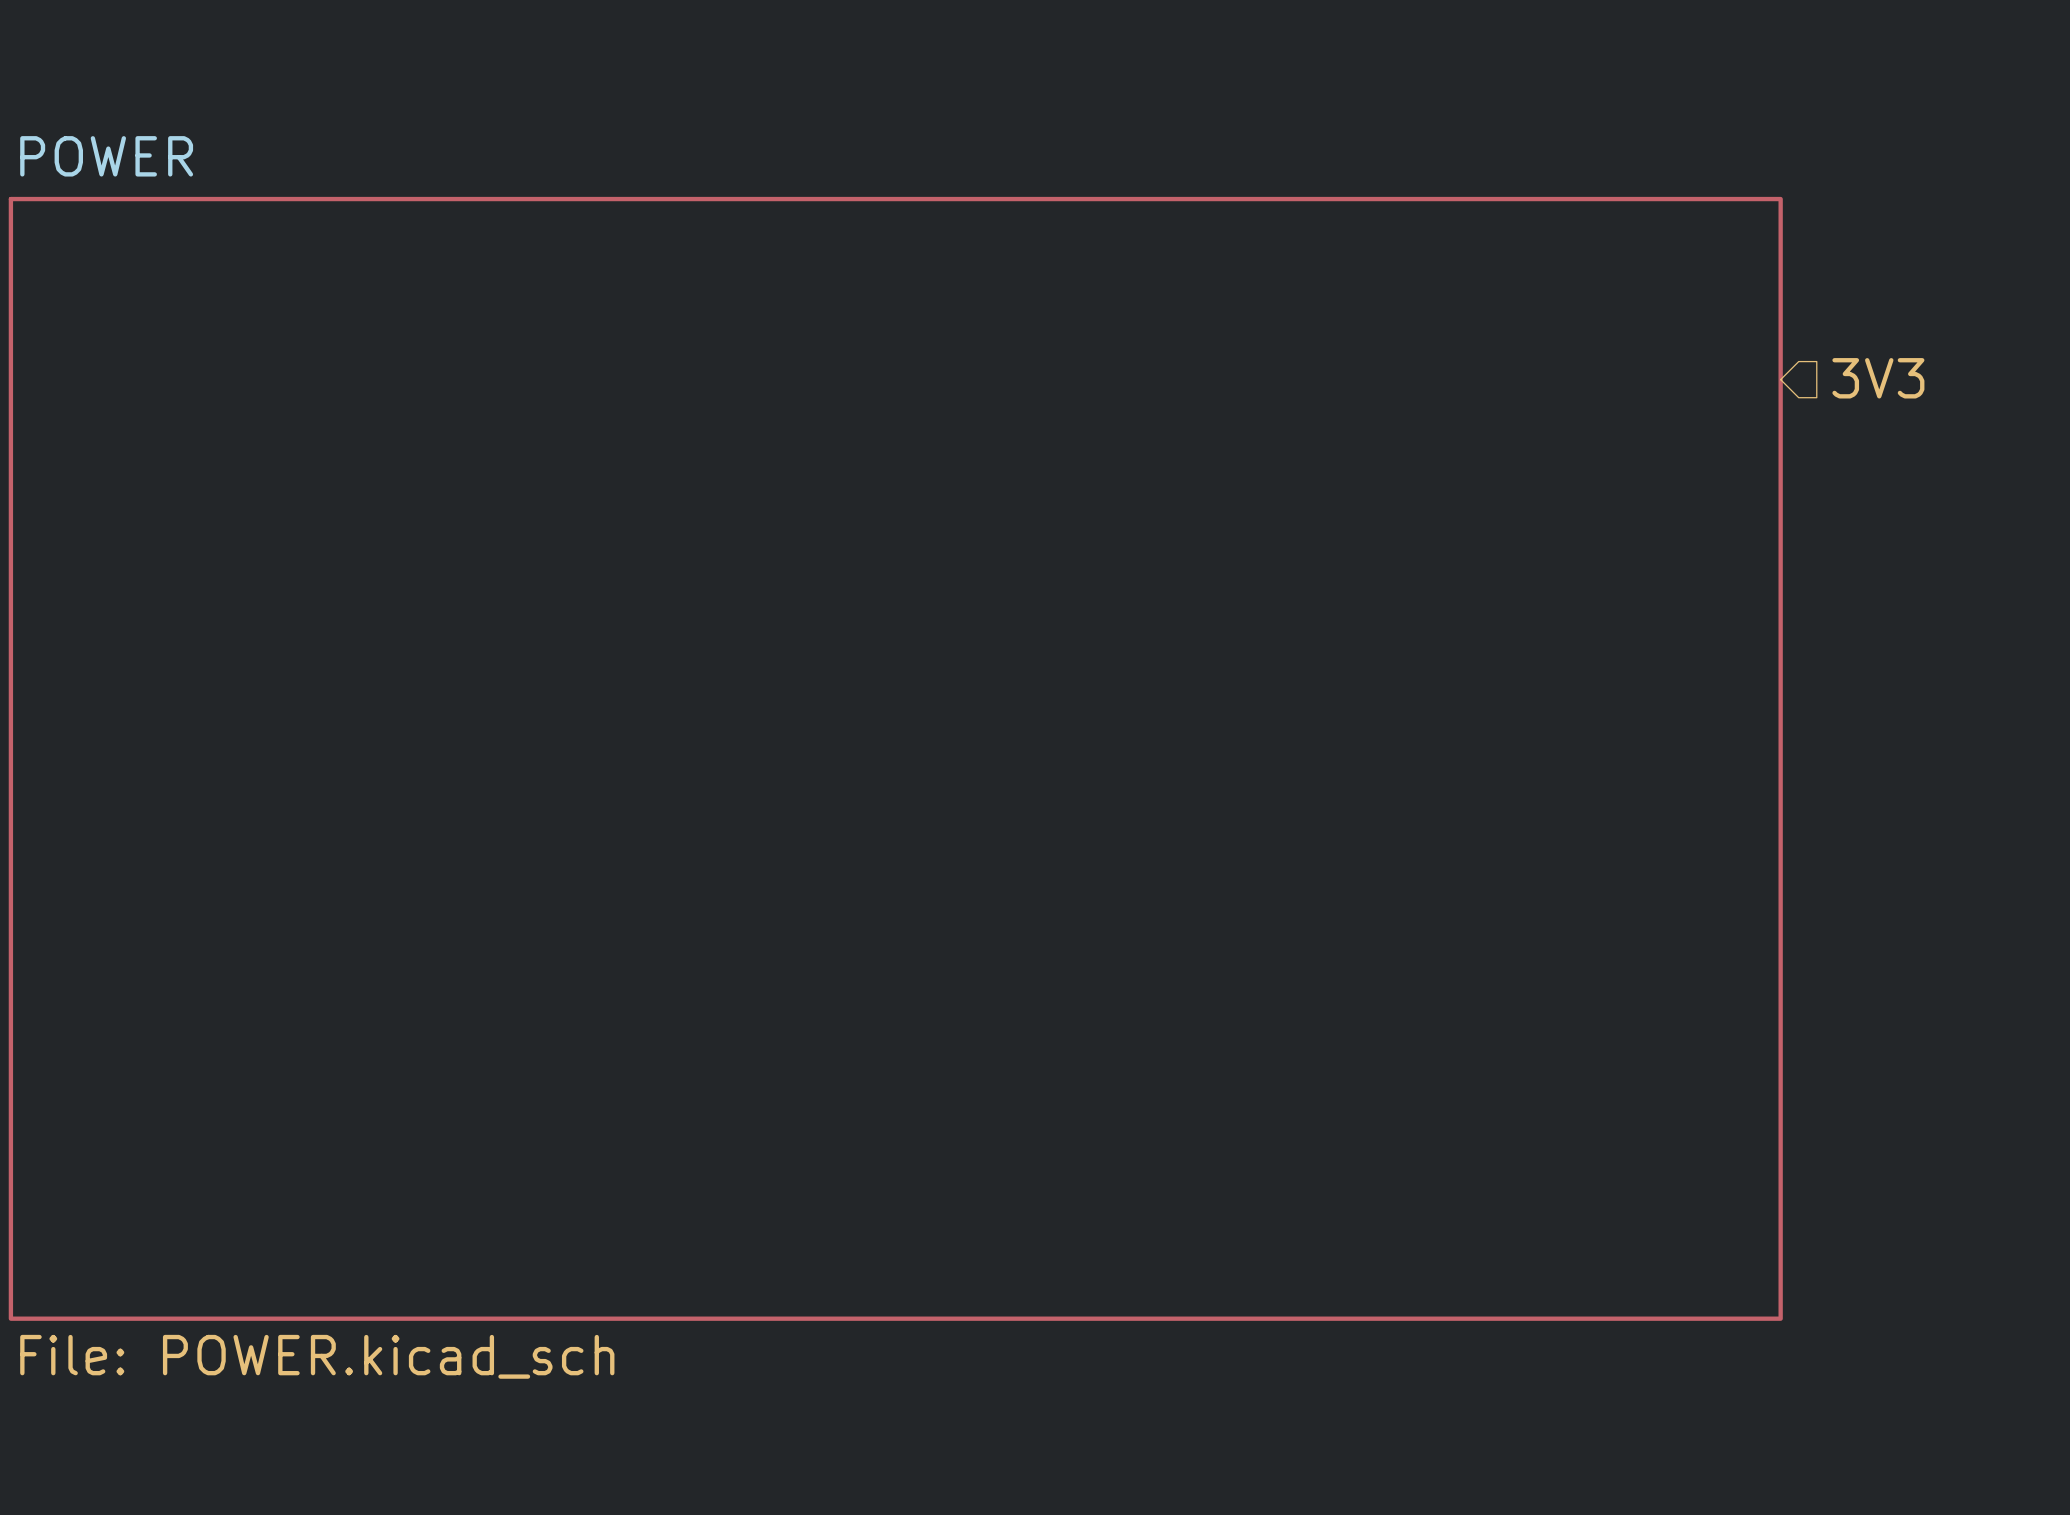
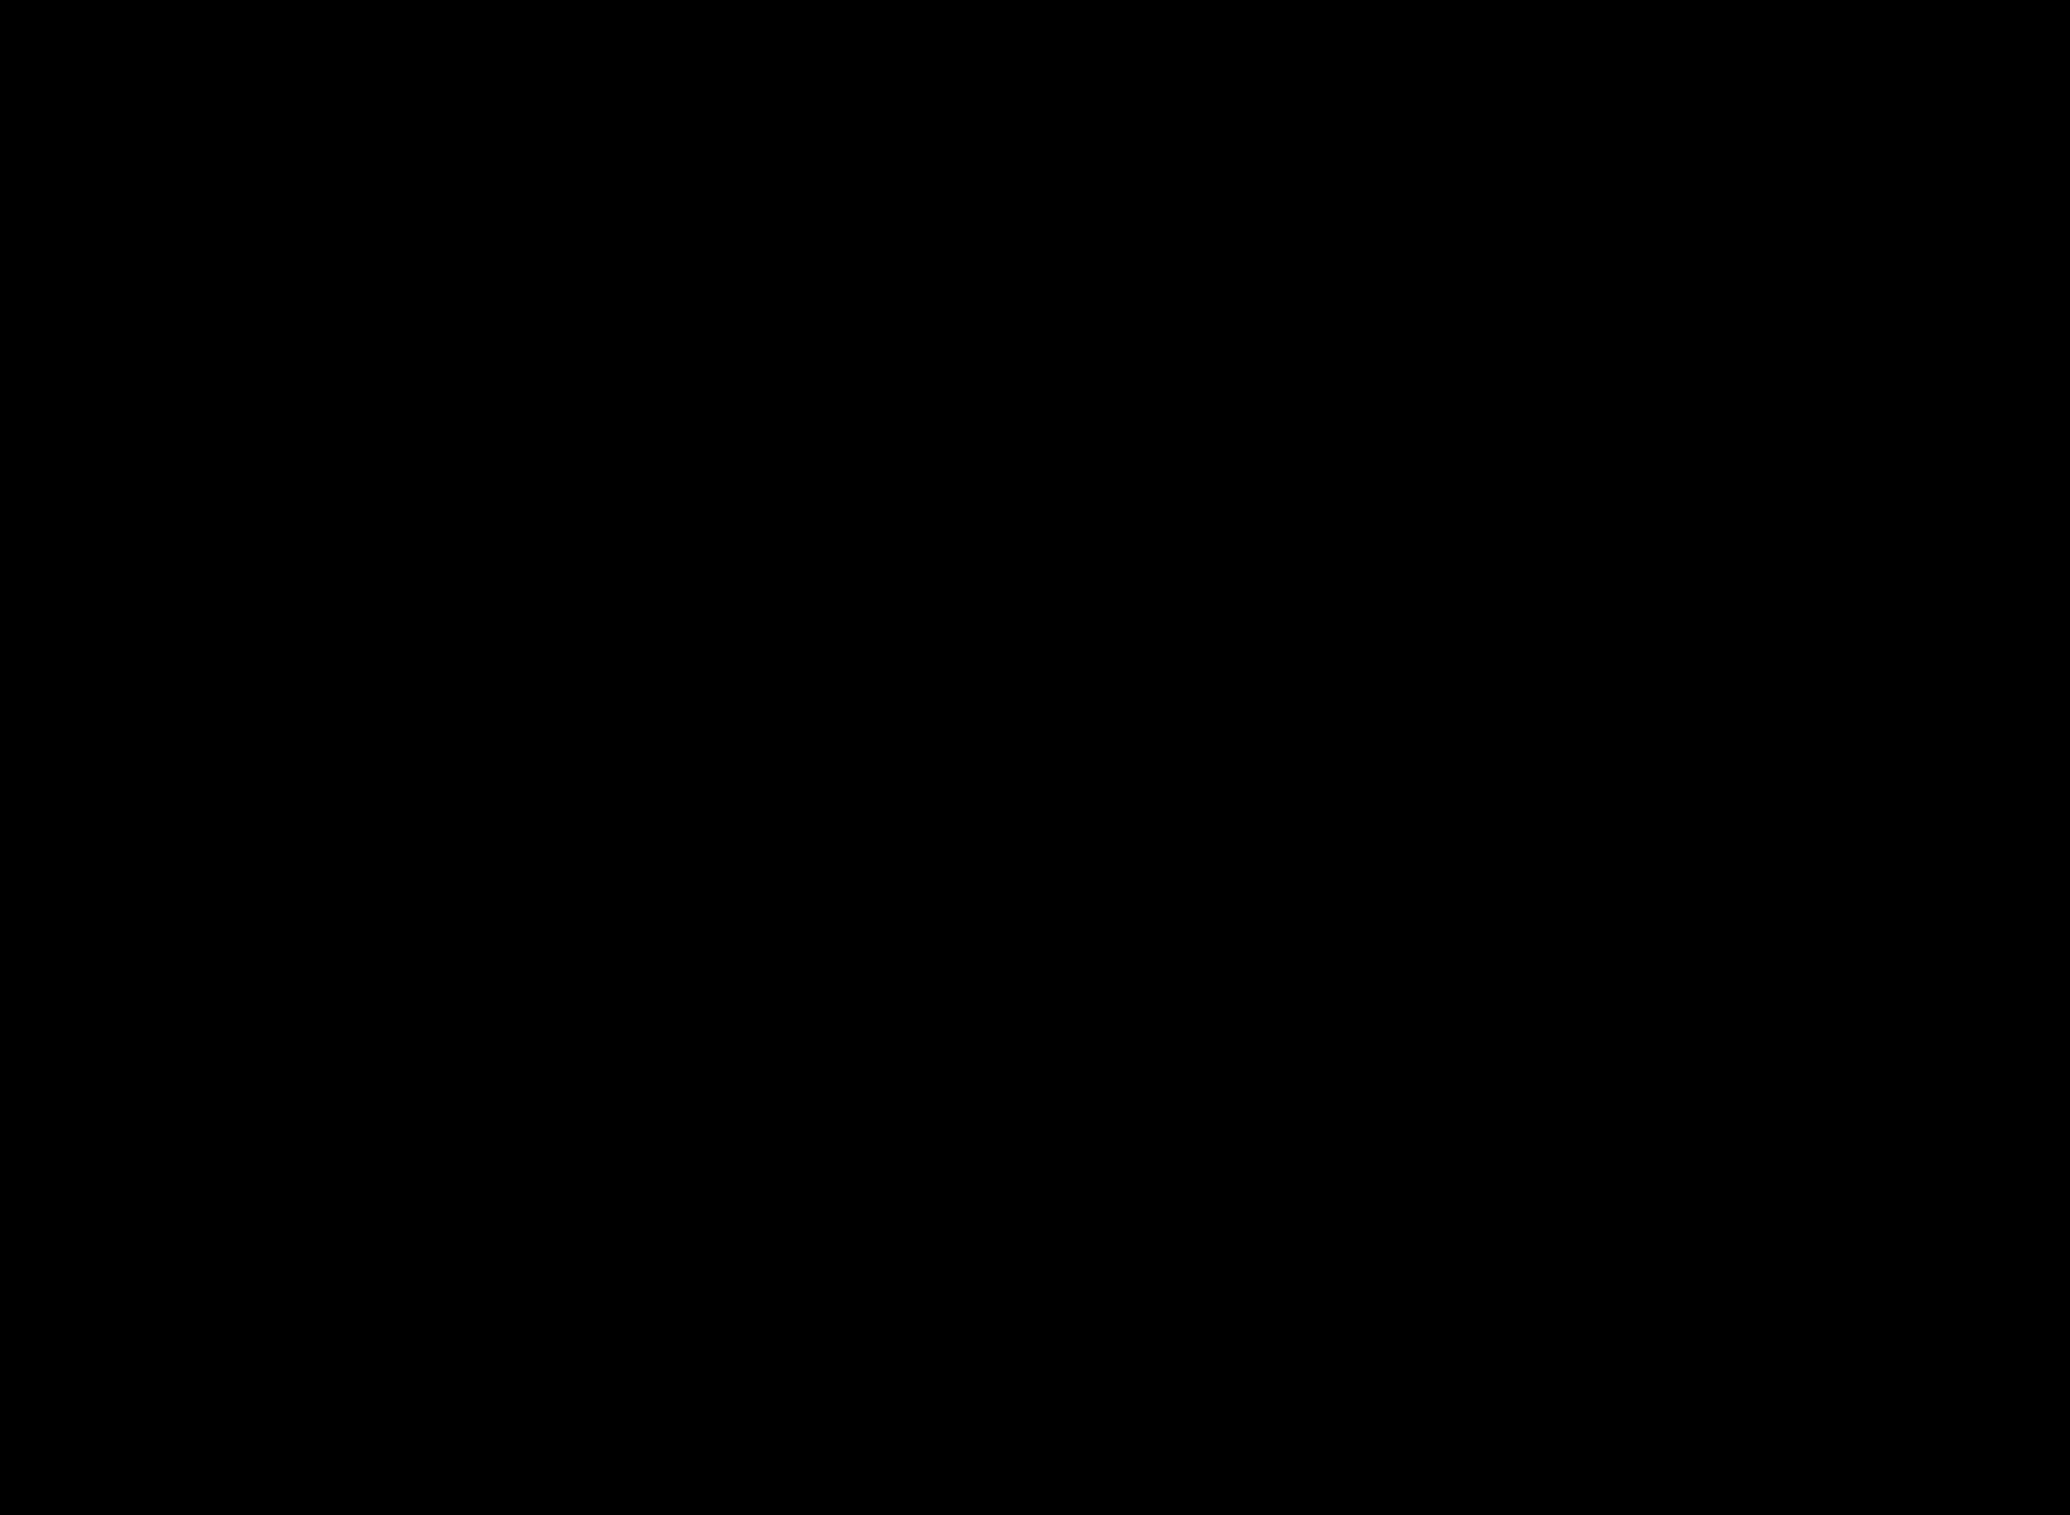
hierarchical label: 3V3 (1878, 378) -> none
sheet POWER: File: POWER.kicad_sch (895, 758) -> none

